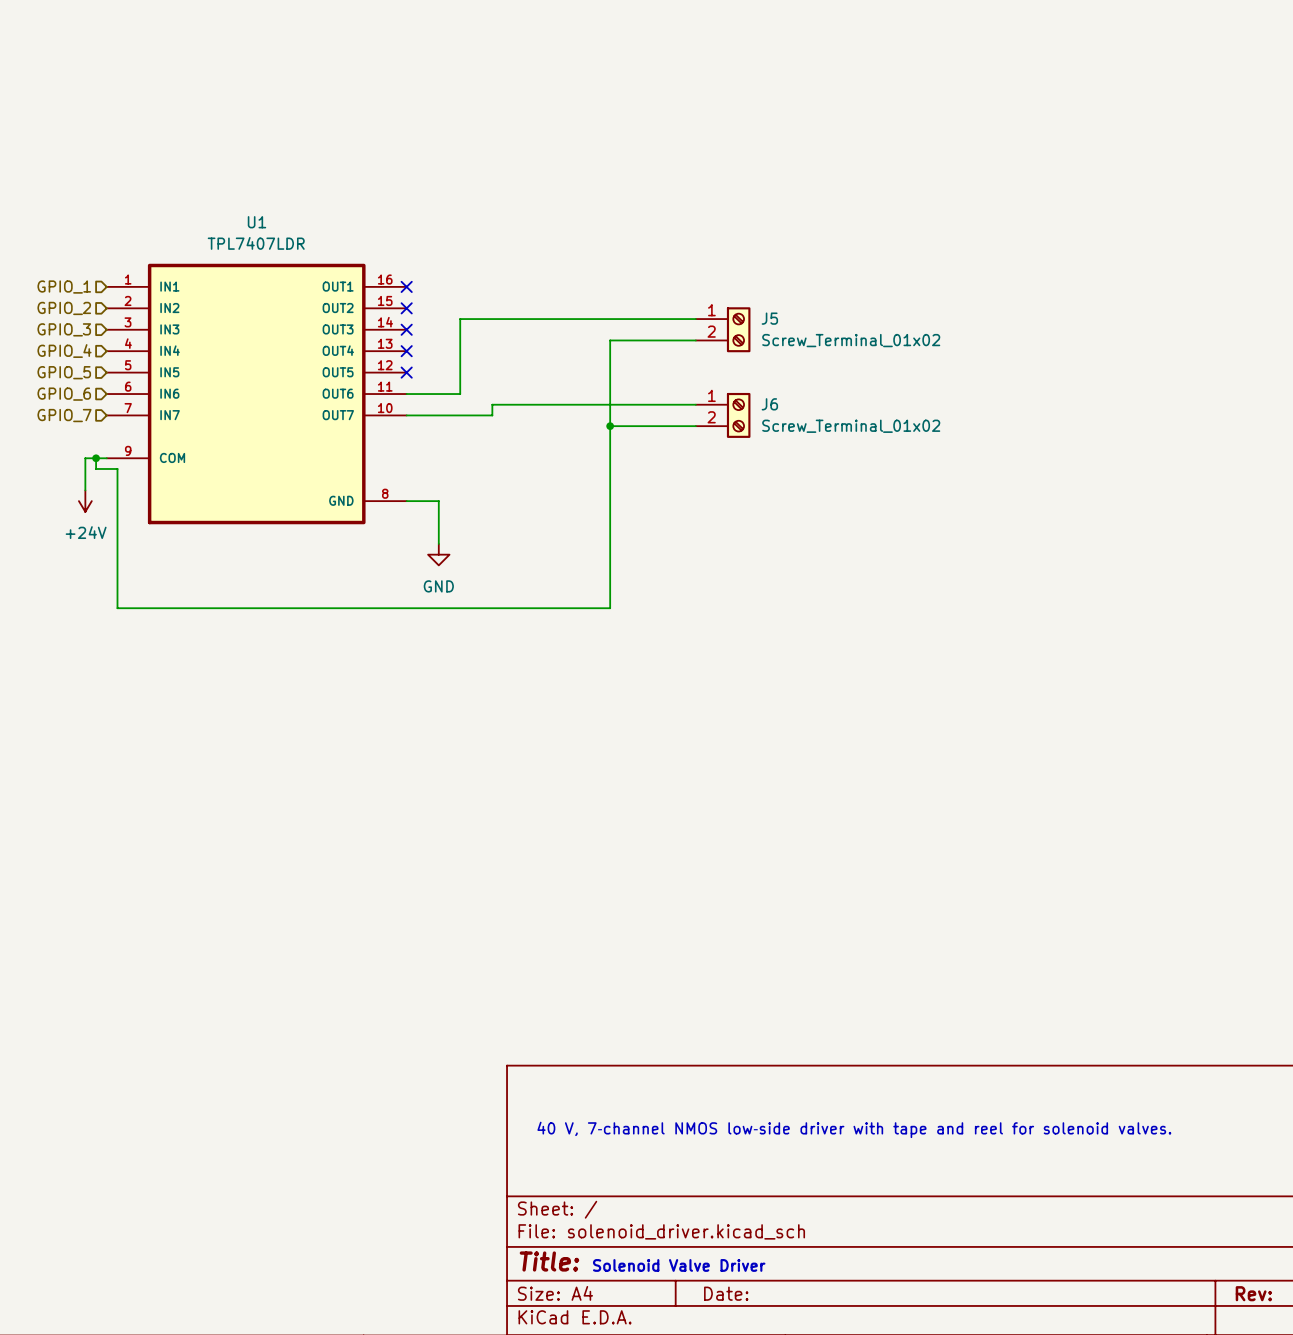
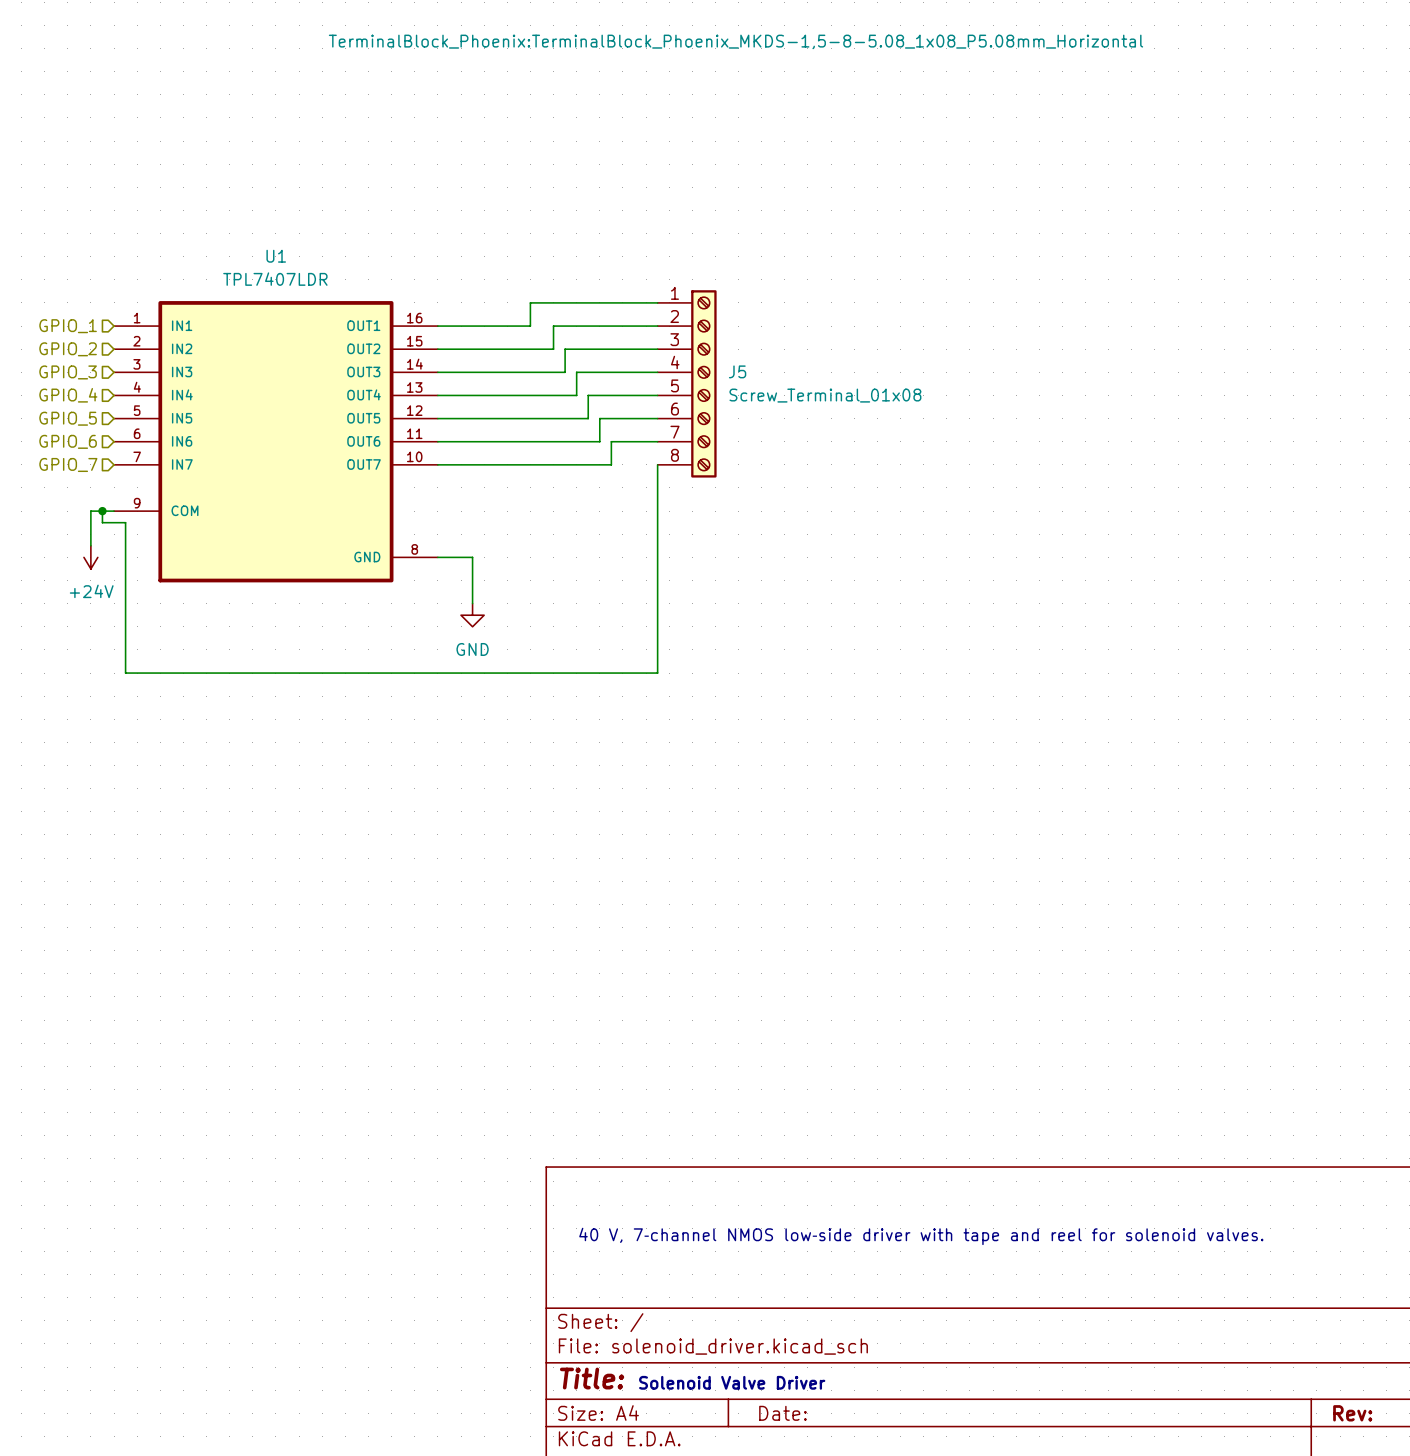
J5 text: none -> TerminalBlock_Phoenix:TerminalBlock_Phoenix_MKDS-1,5-8-5.08_1x08_P5.08mm_Horizontal (736, 41)
wire: none -> (657, 302) (530, 302) (530, 326) (437, 326)
no-connect mark: (406, 286) -> none
wire: none -> (657, 326) (553, 326) (553, 349) (437, 349)
J5 symbol: [695, 307, 751, 353] -> [657, 290, 717, 478]
no-connect mark: (406, 308) -> none
wire: none -> (657, 349) (565, 349) (565, 372) (437, 372)
wire: (695, 319) (460, 319) (460, 394) -> (657, 418) (599, 418) (599, 441) (495, 441)
no-connect mark: (406, 329) -> none
wire: none -> (657, 372) (576, 372) (576, 395) (437, 395)
wire: (695, 340) (610, 340) (610, 415) -> none
J5 value: Screw_Terminal_01x02 (851, 340) -> Screw_Terminal_01x08 (825, 395)
no-connect mark: (406, 351) -> none
wire: none -> (657, 395) (588, 395) (588, 418) (437, 418)
no-connect mark: (406, 372) -> none
wire: (695, 404) (492, 404) (492, 415) -> (657, 441) (611, 441) (611, 464) (530, 464)
J6: Screw_Terminal_01x02 (723, 415) -> none
wire: (610, 426) (695, 426) -> none
junction: (610, 426) -> none

